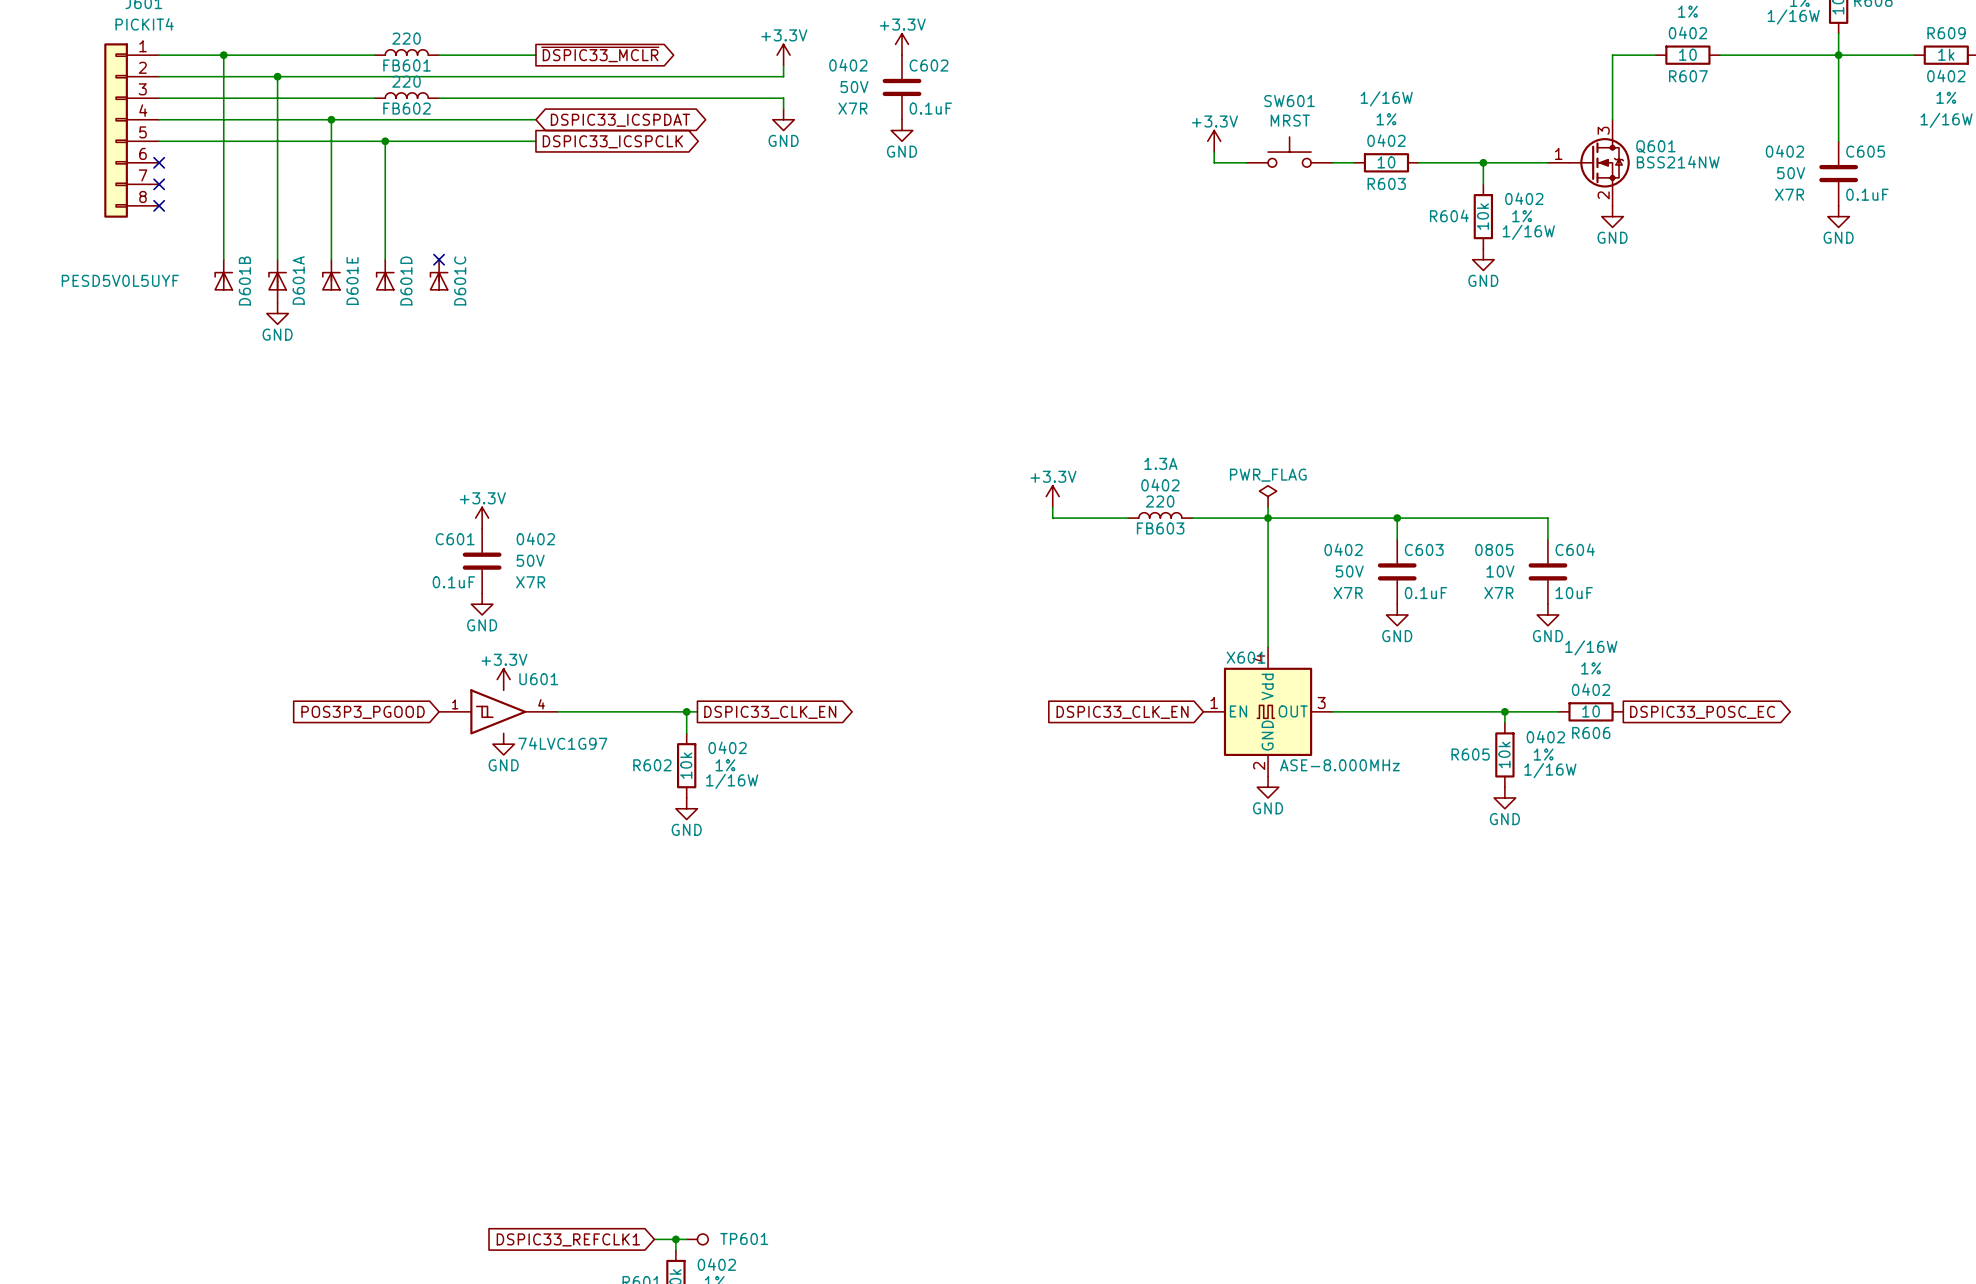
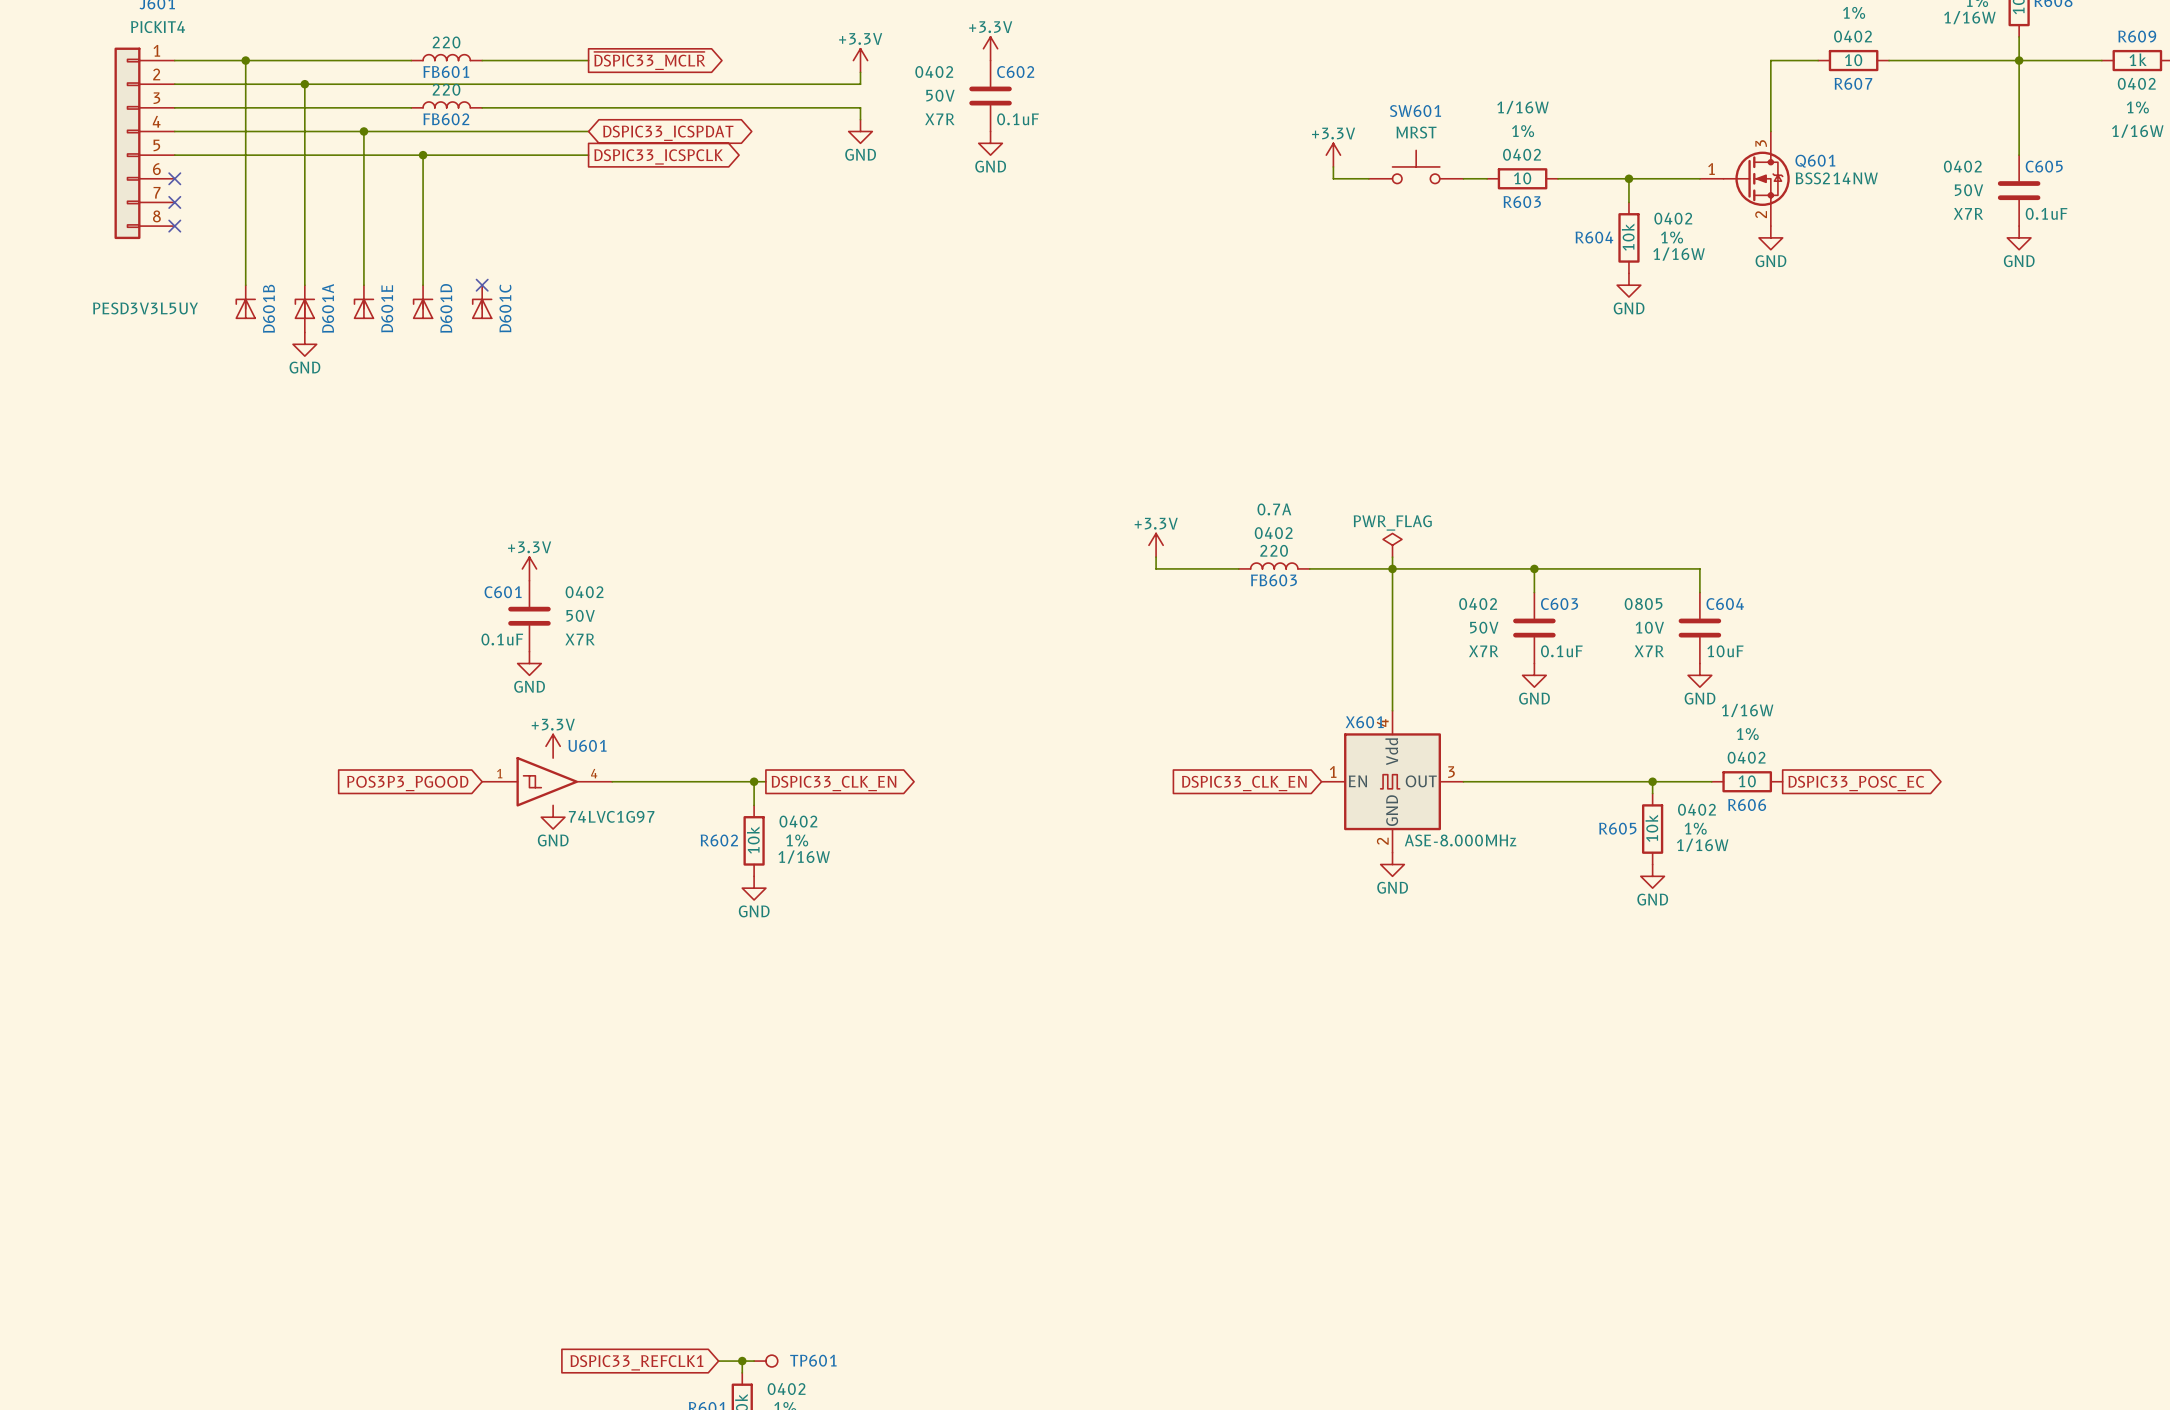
D601A value: PESD5V0L5UYF (120, 280) -> PESD3V3L5UY (145, 308)
FB603 text: 1.3A (1160, 463) -> 0.7A (1274, 509)

